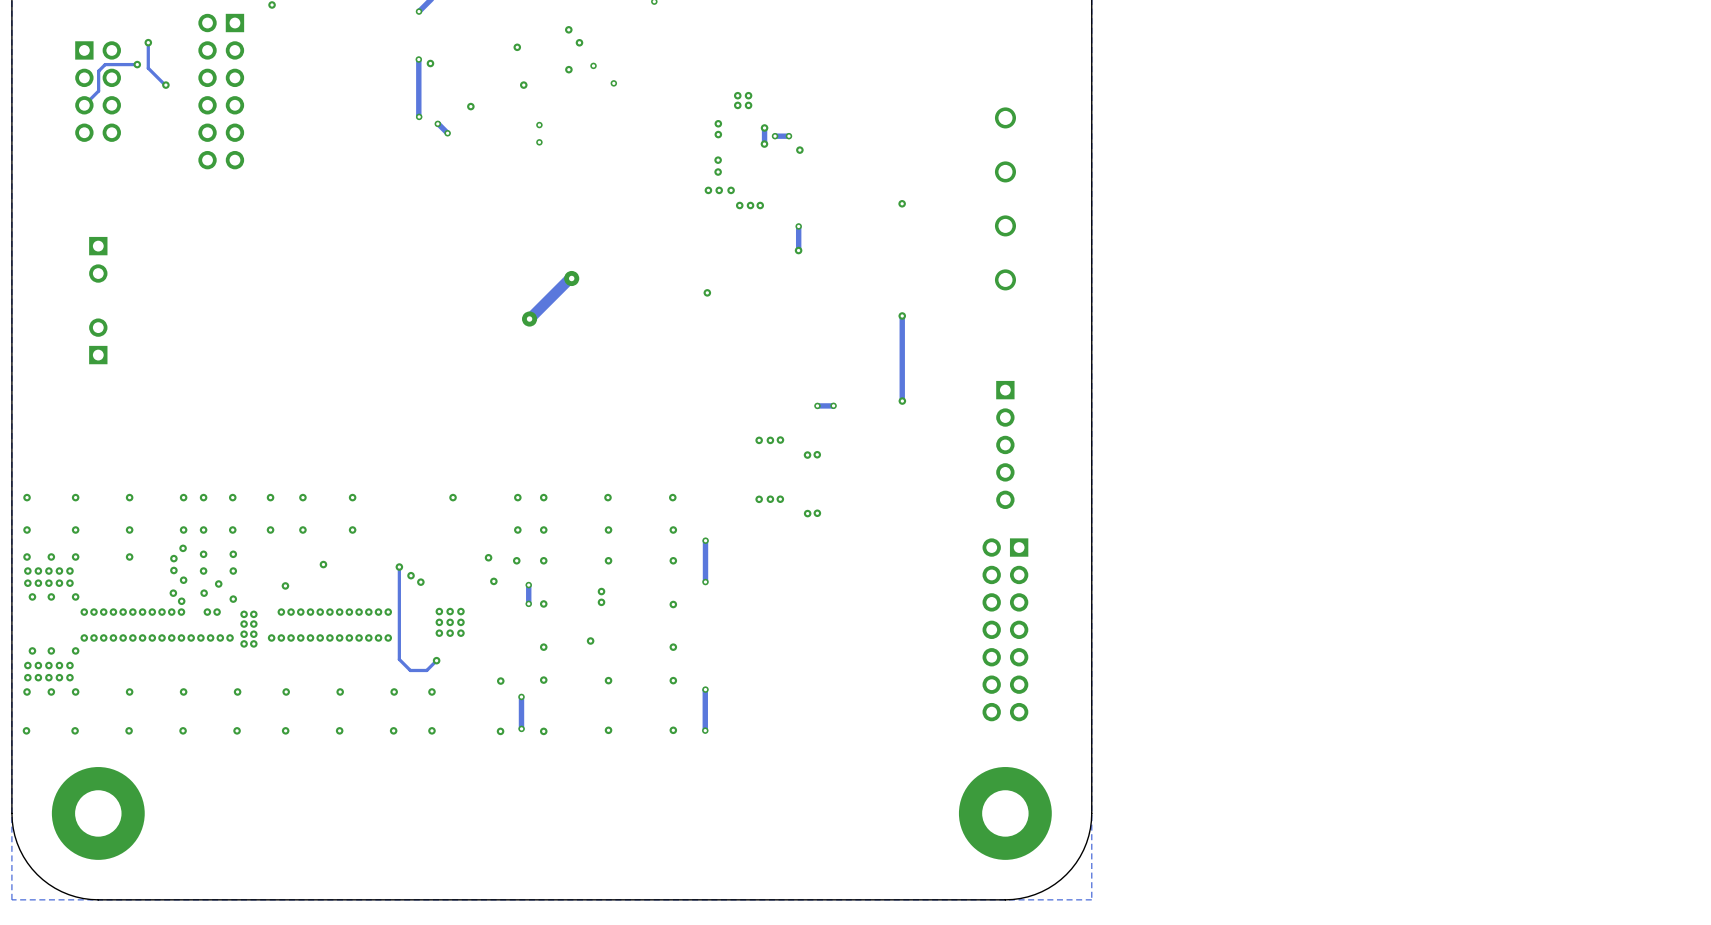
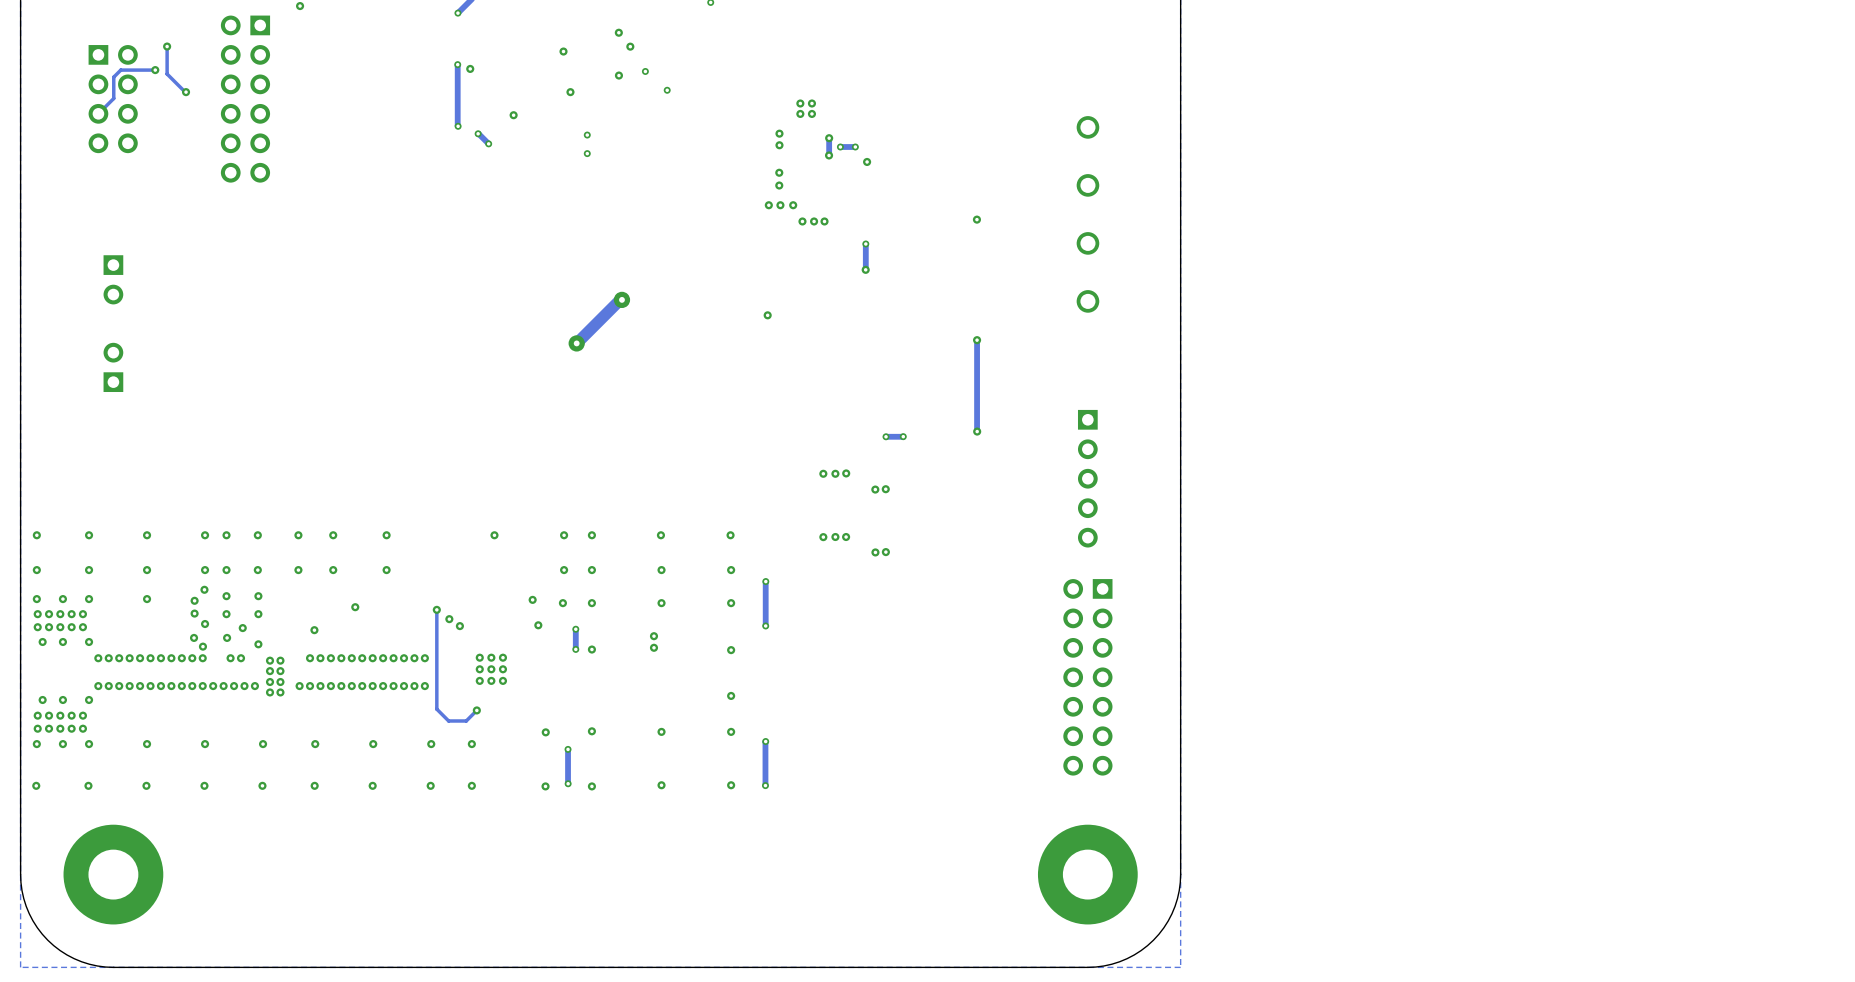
via: (590, 641) -> none
via: (543, 647) -> none

